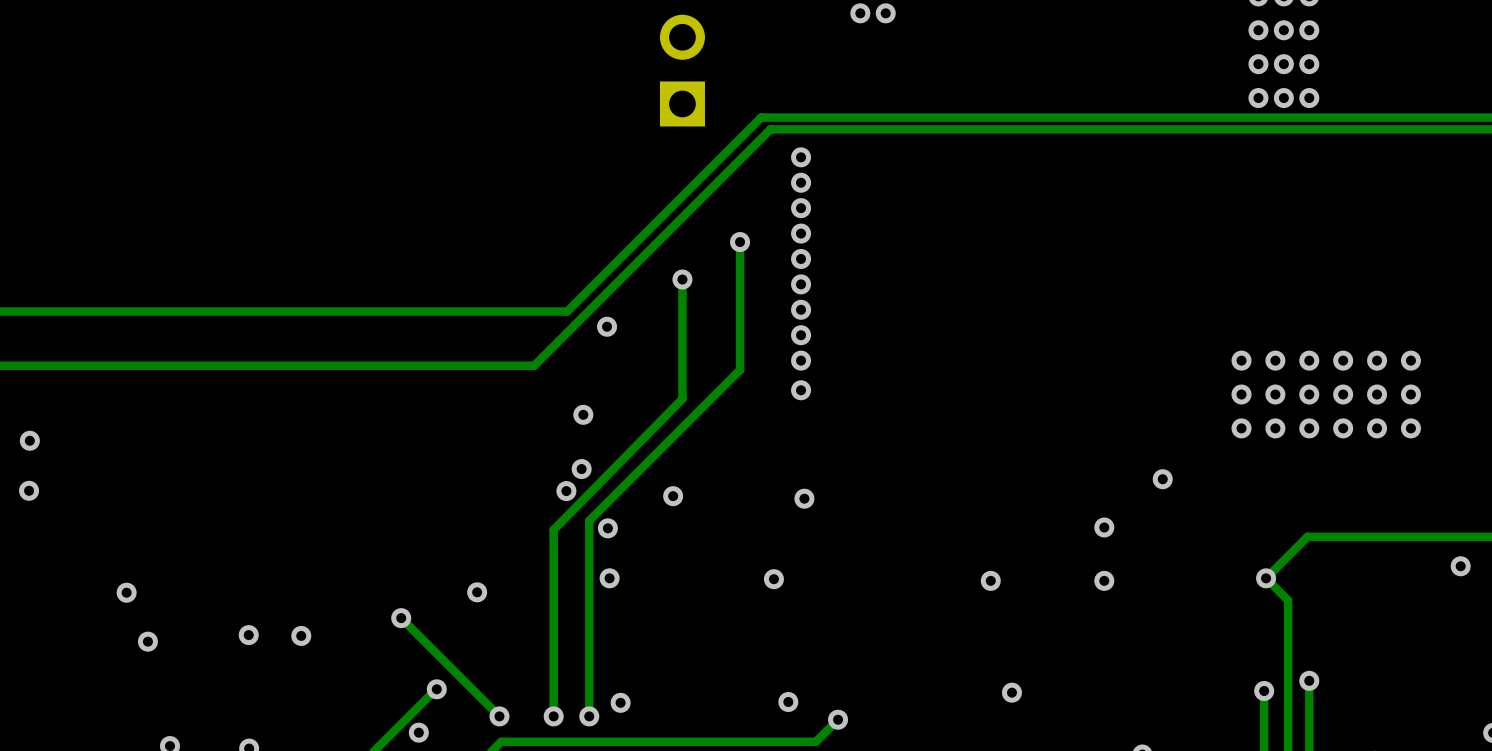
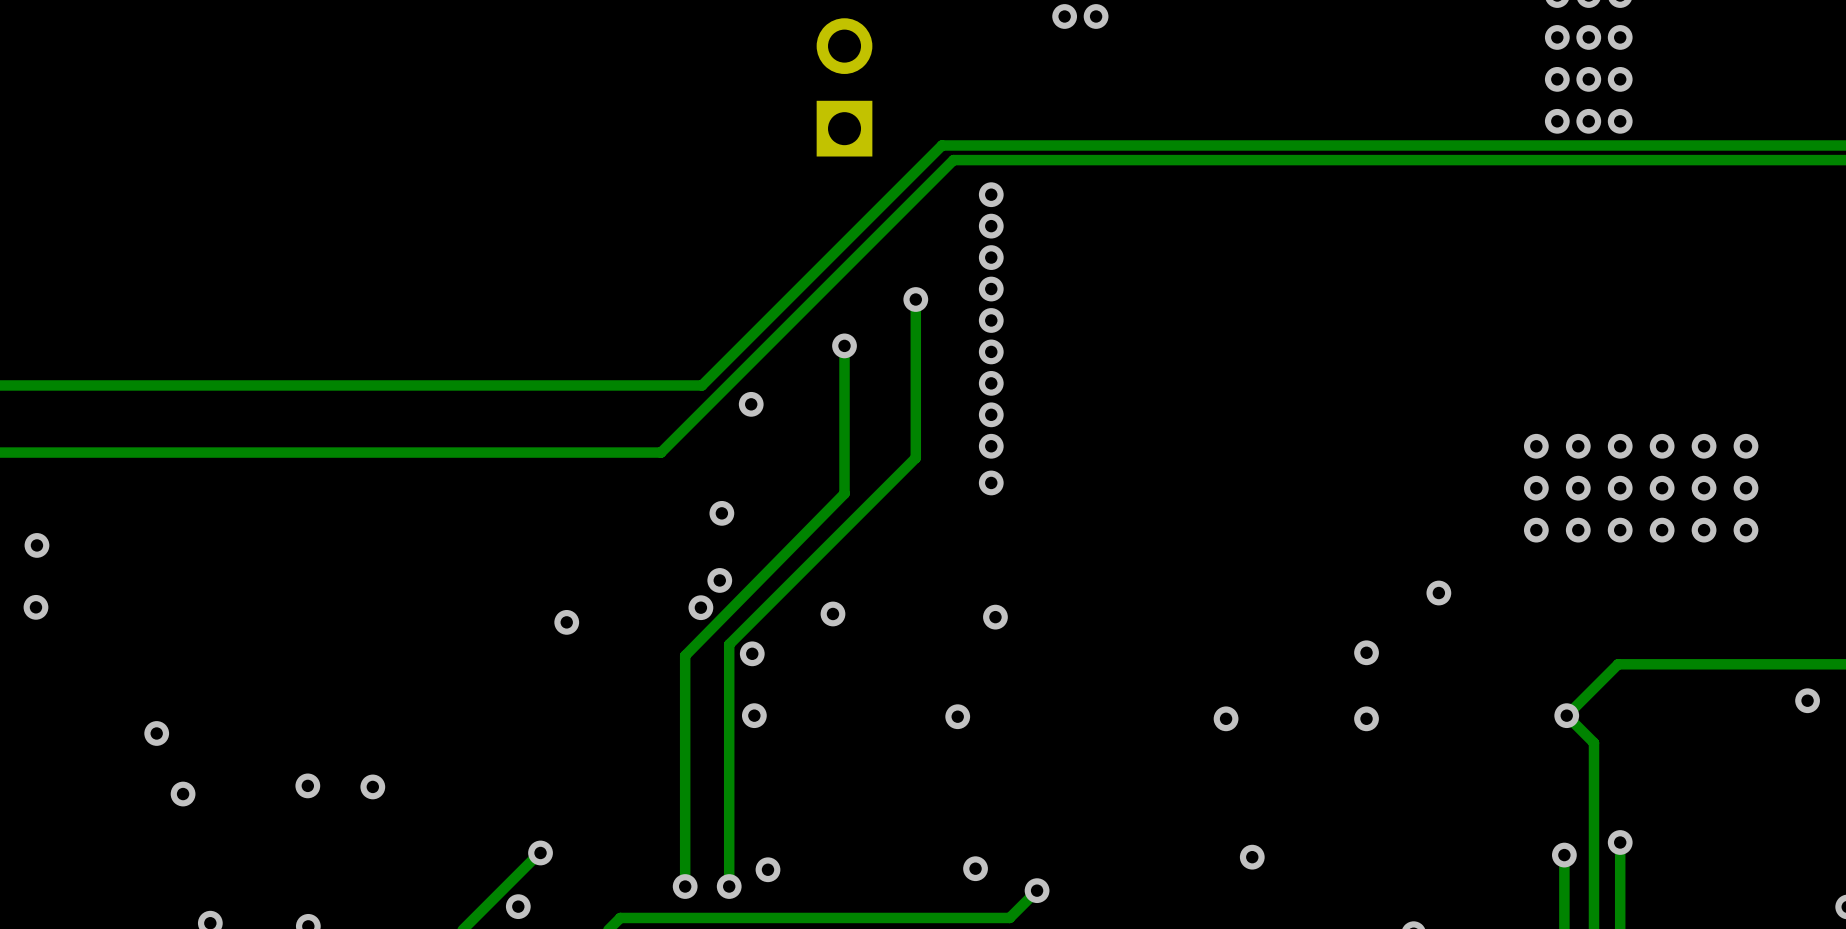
via: none -> (566, 622)
via: (477, 592) -> none
track: (401, 618) (499, 716) -> none
via: (401, 618) -> none
via: (499, 716) -> none

